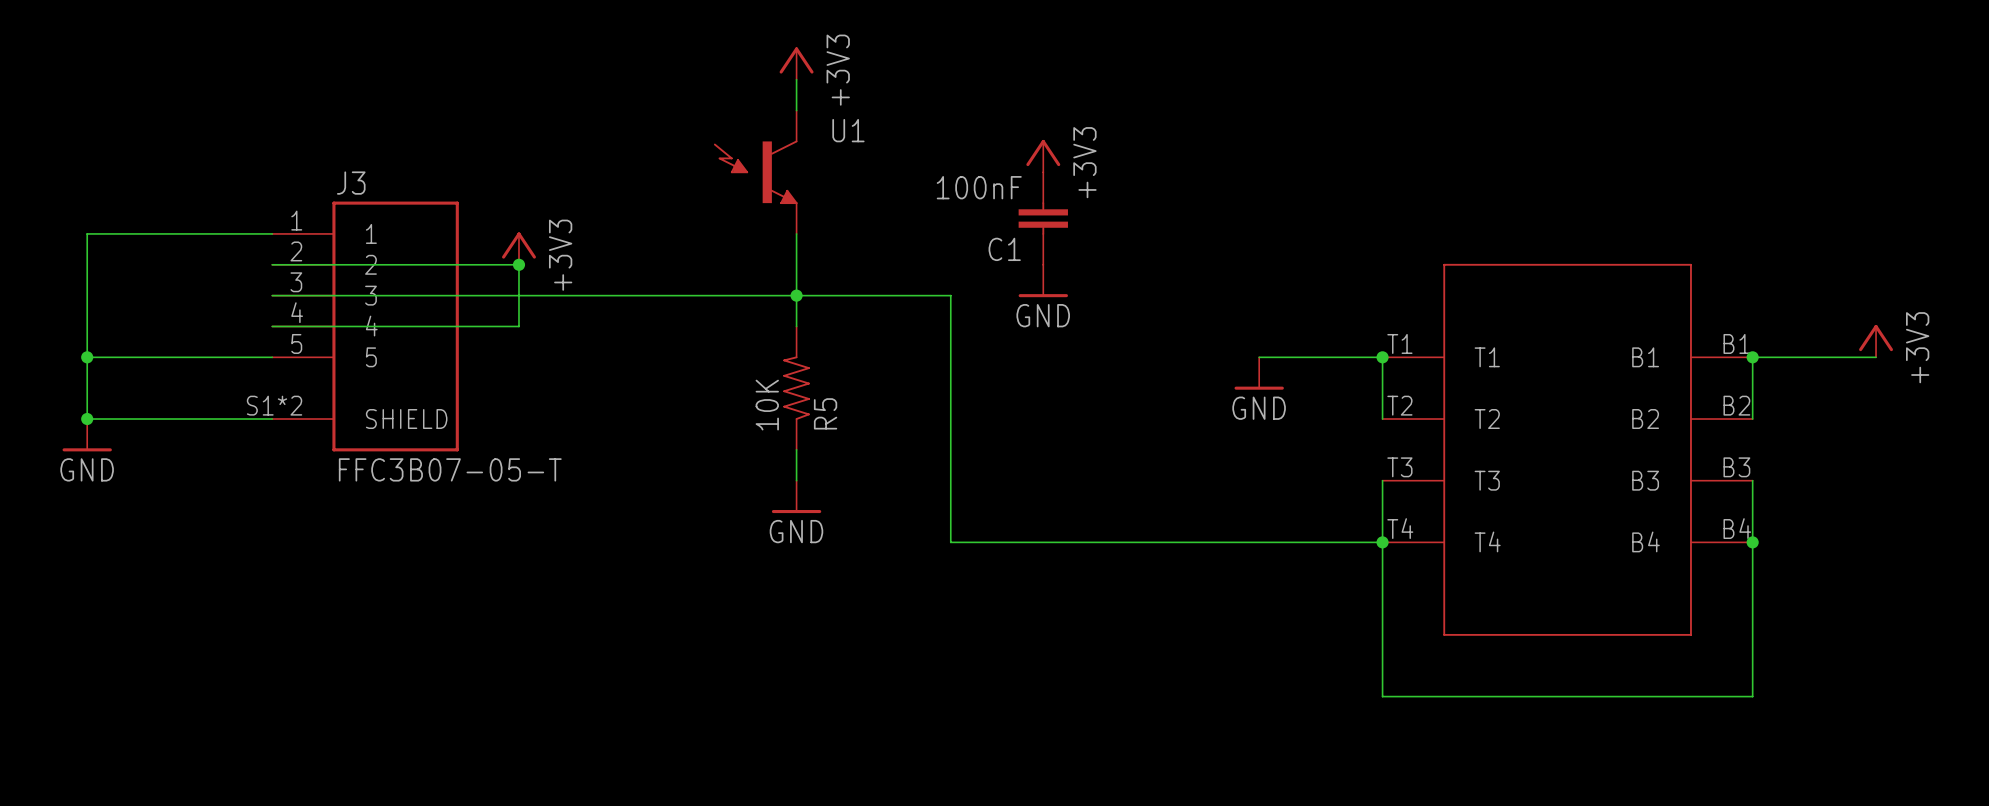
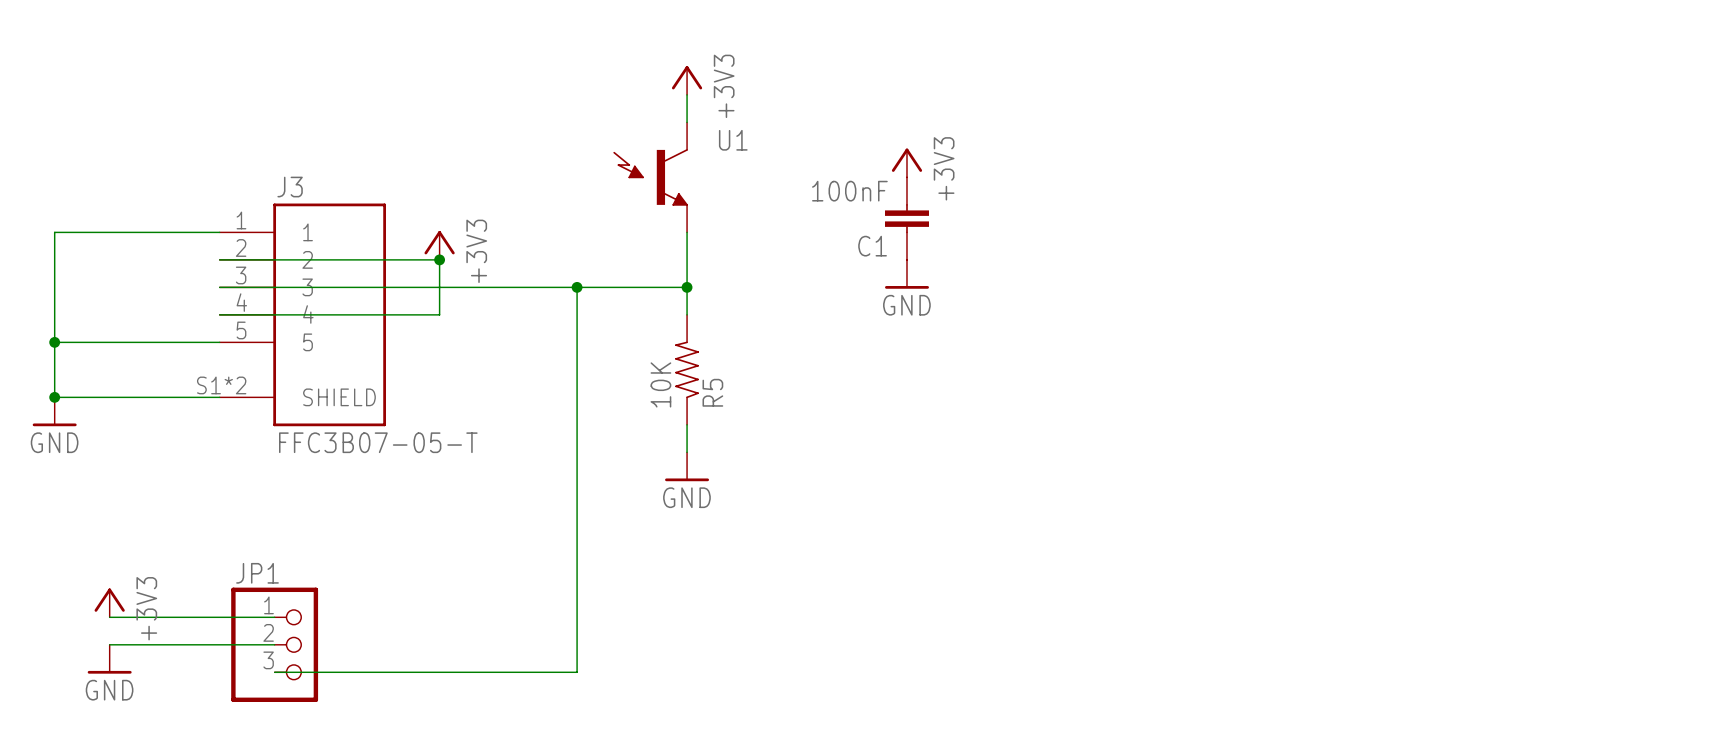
wire: none -> (577, 287) (577, 672) (274, 672)
junction: none -> (577, 287)
wire: (796, 295) (950, 295) (950, 542) (1382, 542) -> none
power symbol: +3V3 (1876, 341) -> none
wire: (1259, 357) (1382, 357) (1382, 419) -> none
junction: (1382, 357) -> none
junction: (1752, 357) -> none
wire: (1876, 357) (1752, 357) (1752, 419) -> none
power symbol: GND (1259, 373) -> none
part: (1567, 449) -> none
wire: (1382, 480) (1382, 696) (1752, 696) (1752, 480) -> none
junction: (1382, 542) -> none
junction: (1752, 542) -> none
power symbol: none -> +3V3 (109, 602)
wire: none -> (109, 617) (274, 617)
wire: none -> (109, 644) (274, 644)
JP1: none -> (274, 644)
power symbol: none -> GND (109, 659)

